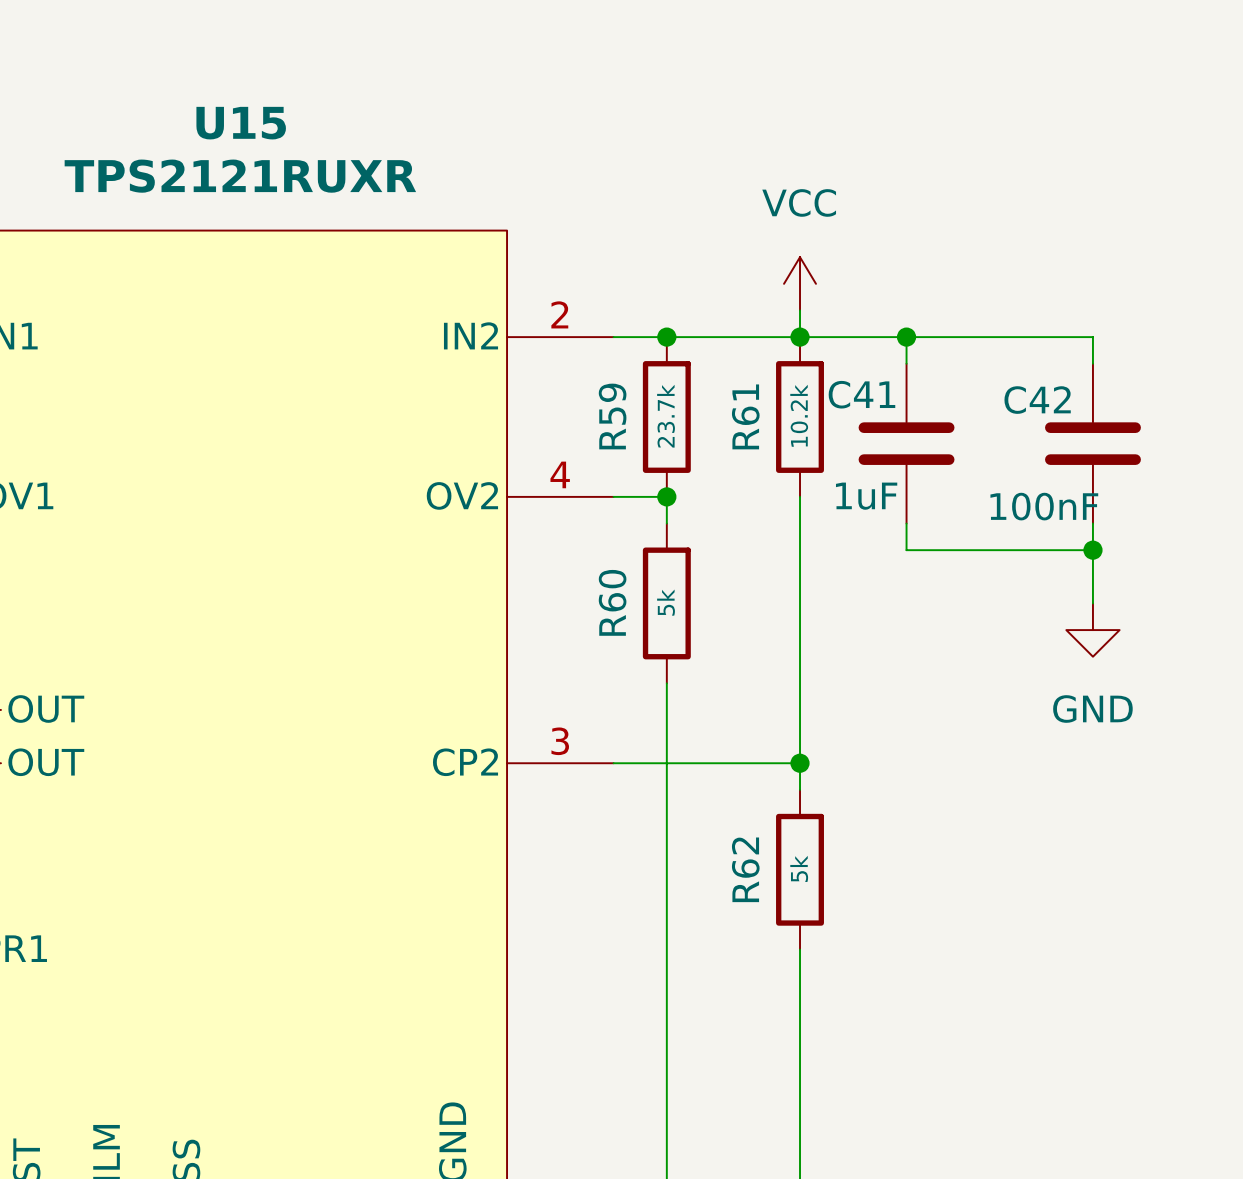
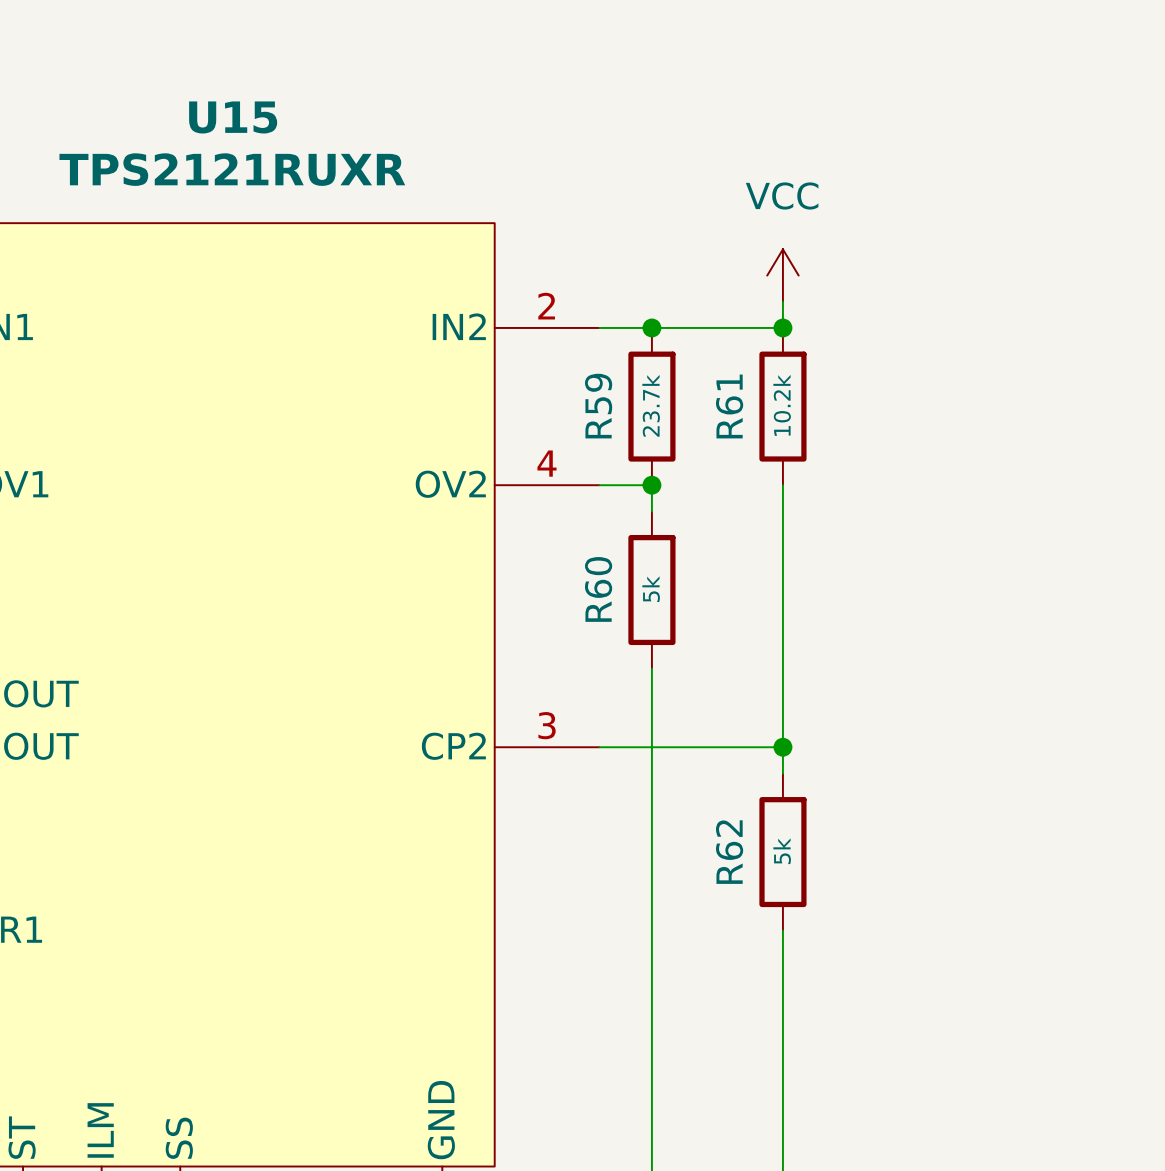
wire: (800, 337) (1092, 337) (1092, 363) -> none
wire: (906, 337) (906, 363) -> none
junction: (906, 337) -> none
C41: 1uF (906, 443) -> none
C42: 100nF (1092, 443) -> none
wire: (906, 523) (906, 550) (1092, 550) -> none
wire: (1092, 523) (1092, 603) -> none
junction: (1092, 550) -> none
power symbol: GND (1092, 630) -> none

